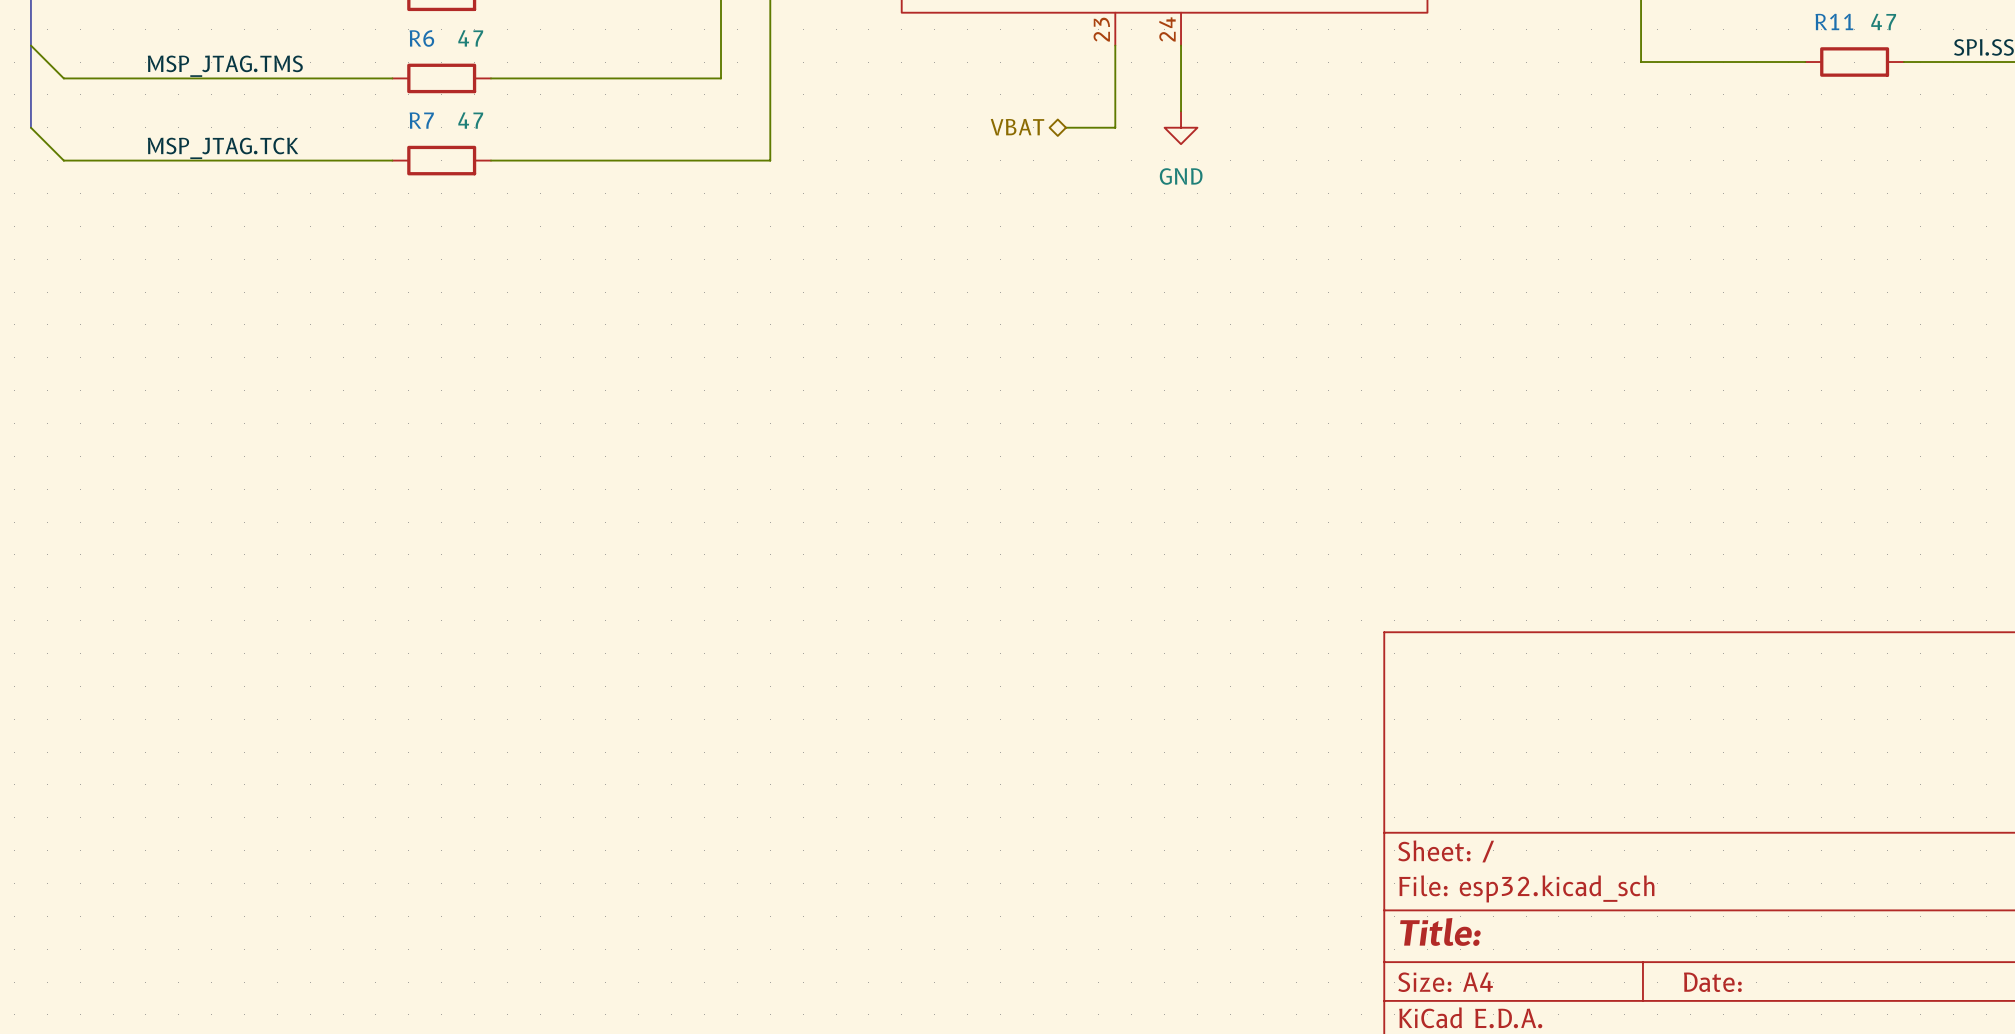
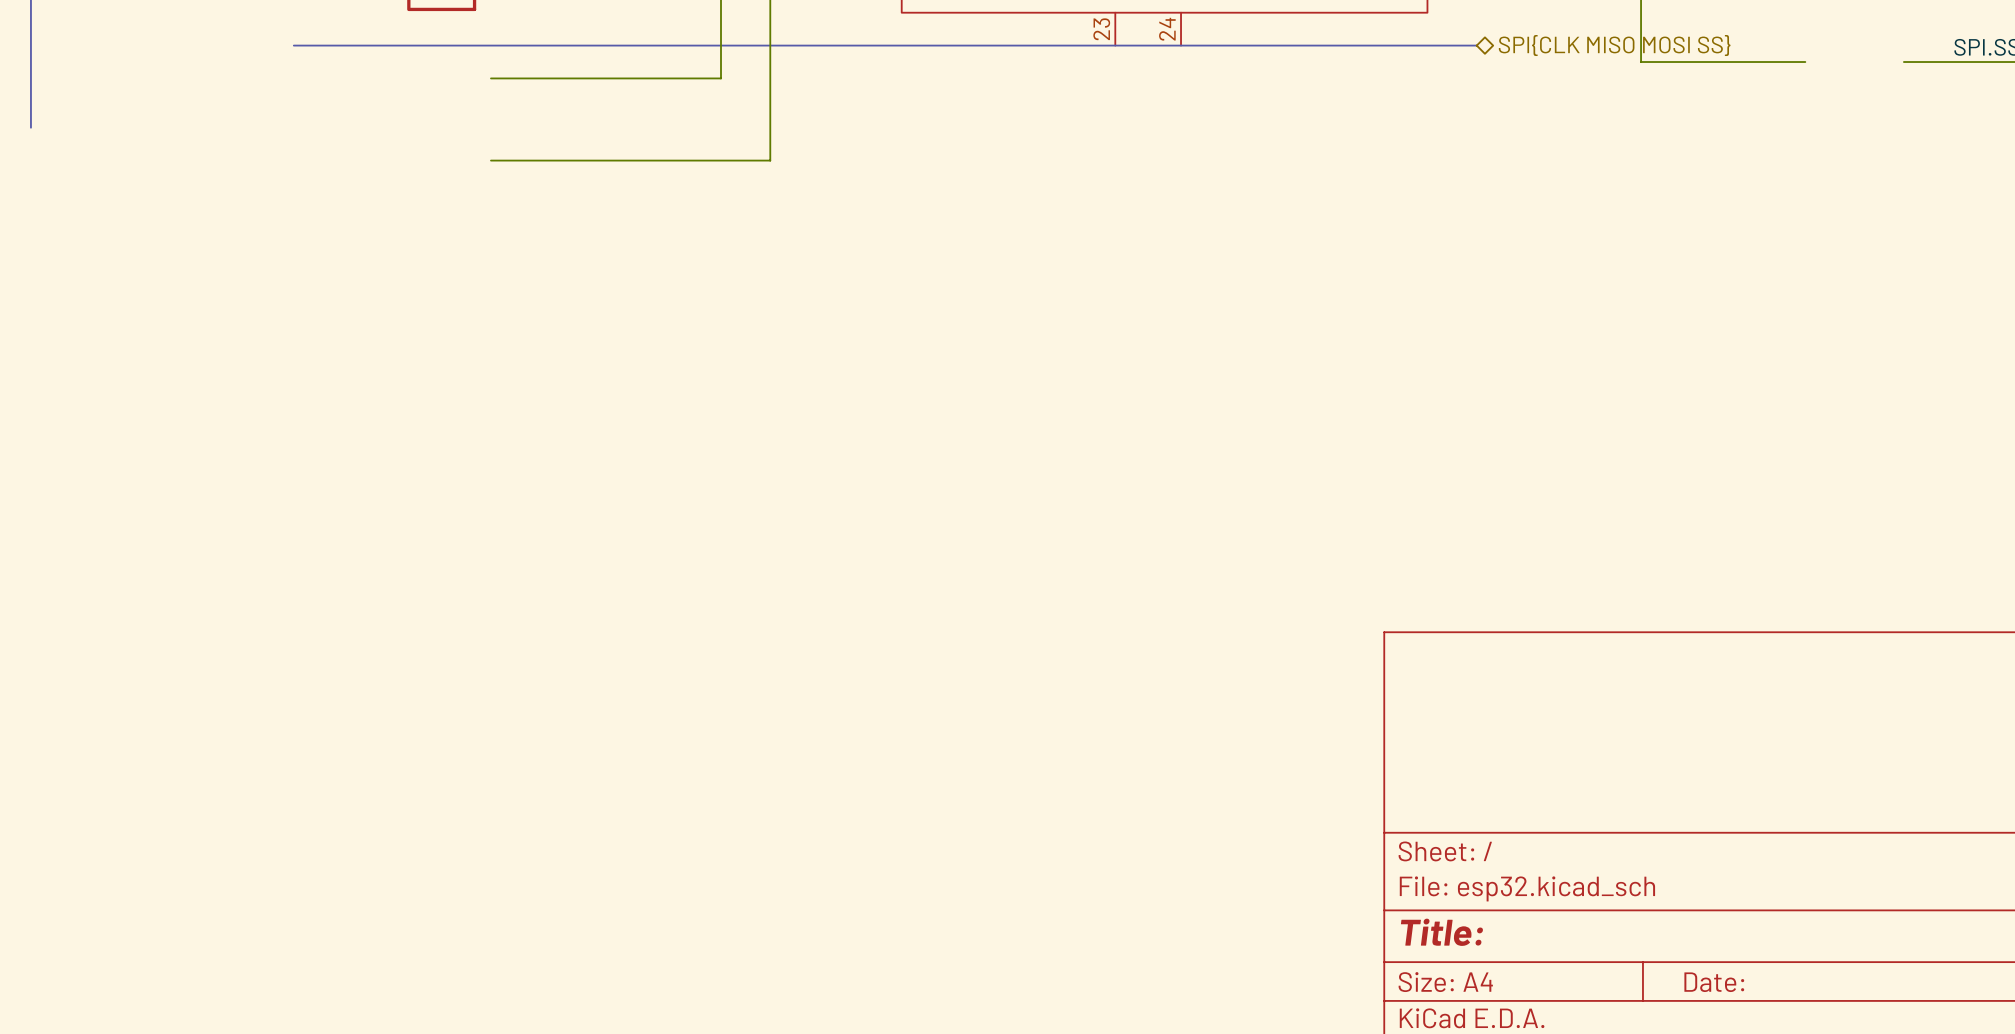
wire: (30, 45) (63, 78) (392, 78) -> none
bus: none -> (293, 45) (1476, 45)
wire: (1115, 45) (1115, 127) (1066, 127) -> none
wire: (1181, 45) (1181, 111) -> none
hierarchical label: none -> SPI{CLK MISO MOSI SS} (1614, 45)
R11: 47 (1854, 62) -> none
label: MSP_JTAG.TMS (225, 66) -> none
R6: 47 (441, 78) -> none
wire: (30, 127) (63, 160) (392, 160) -> none
hierarchical label: VBAT (1017, 127) -> none
power symbol: GND (1181, 127) -> none
label: MSP_JTAG.TCK (223, 148) -> none
R7: 47 (441, 160) -> none

